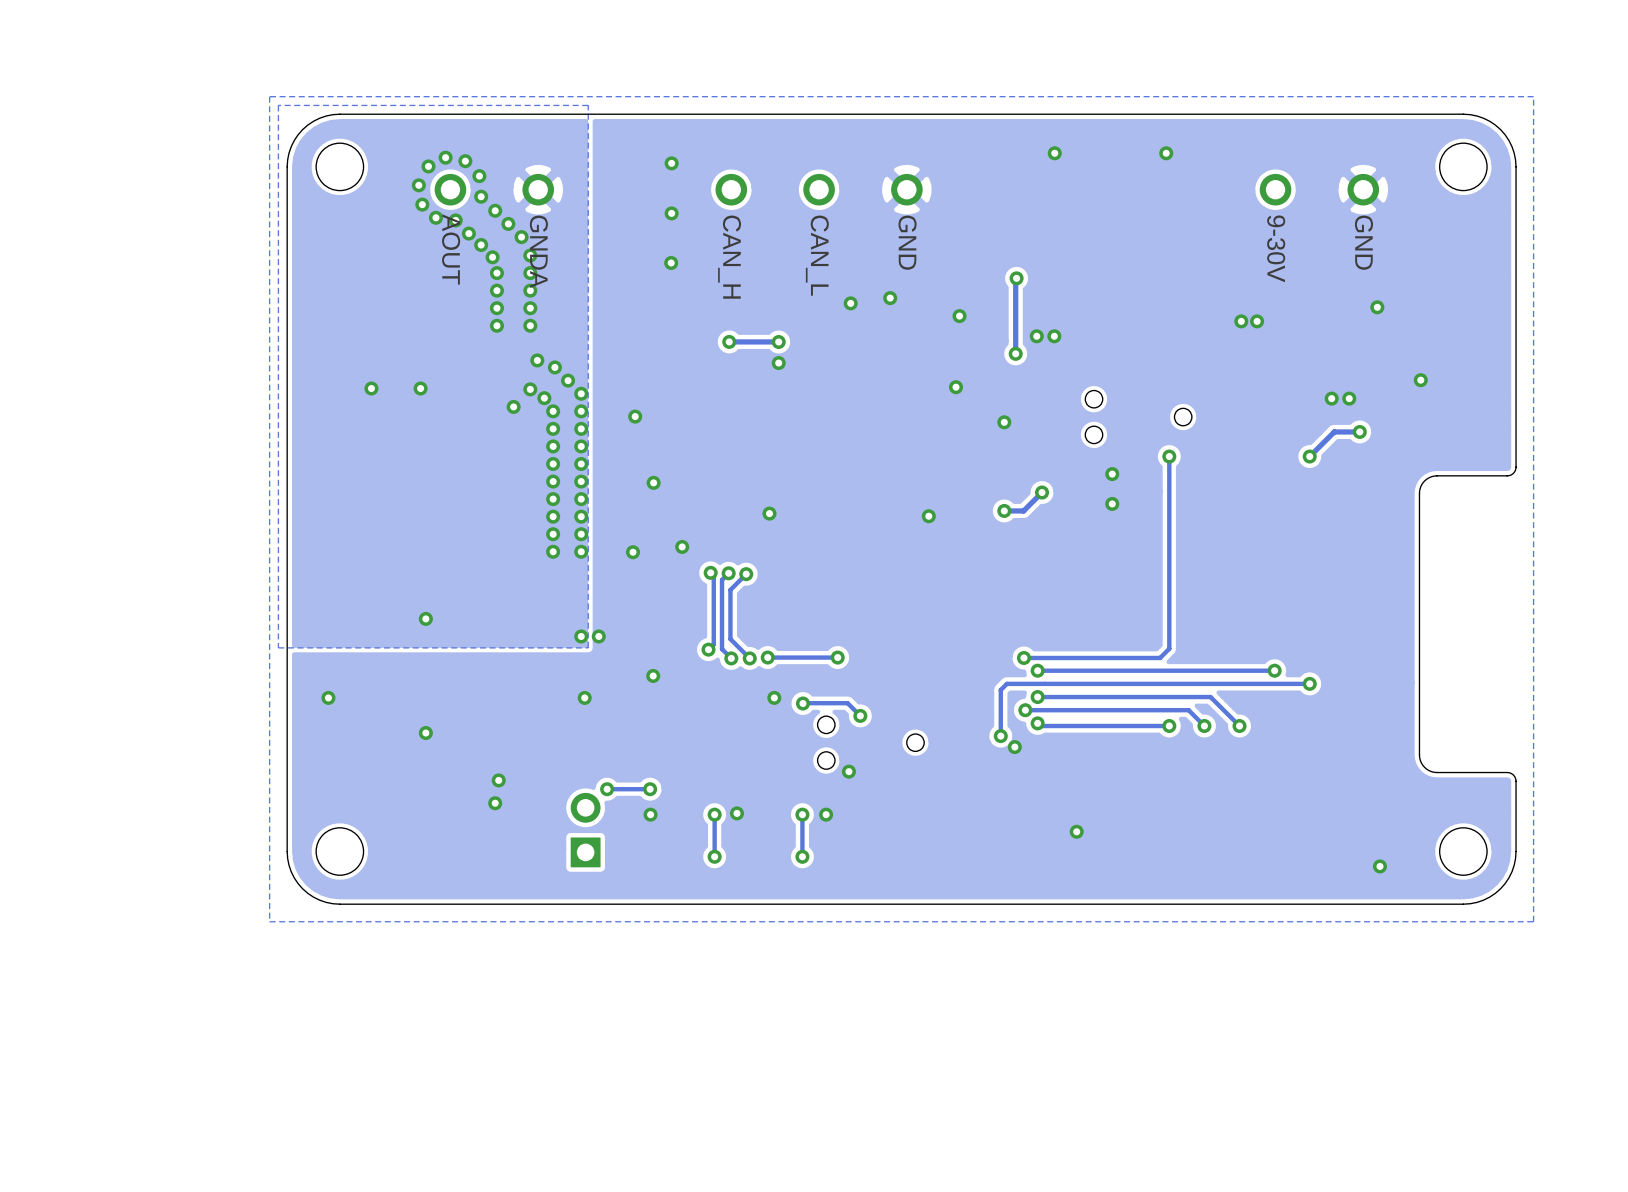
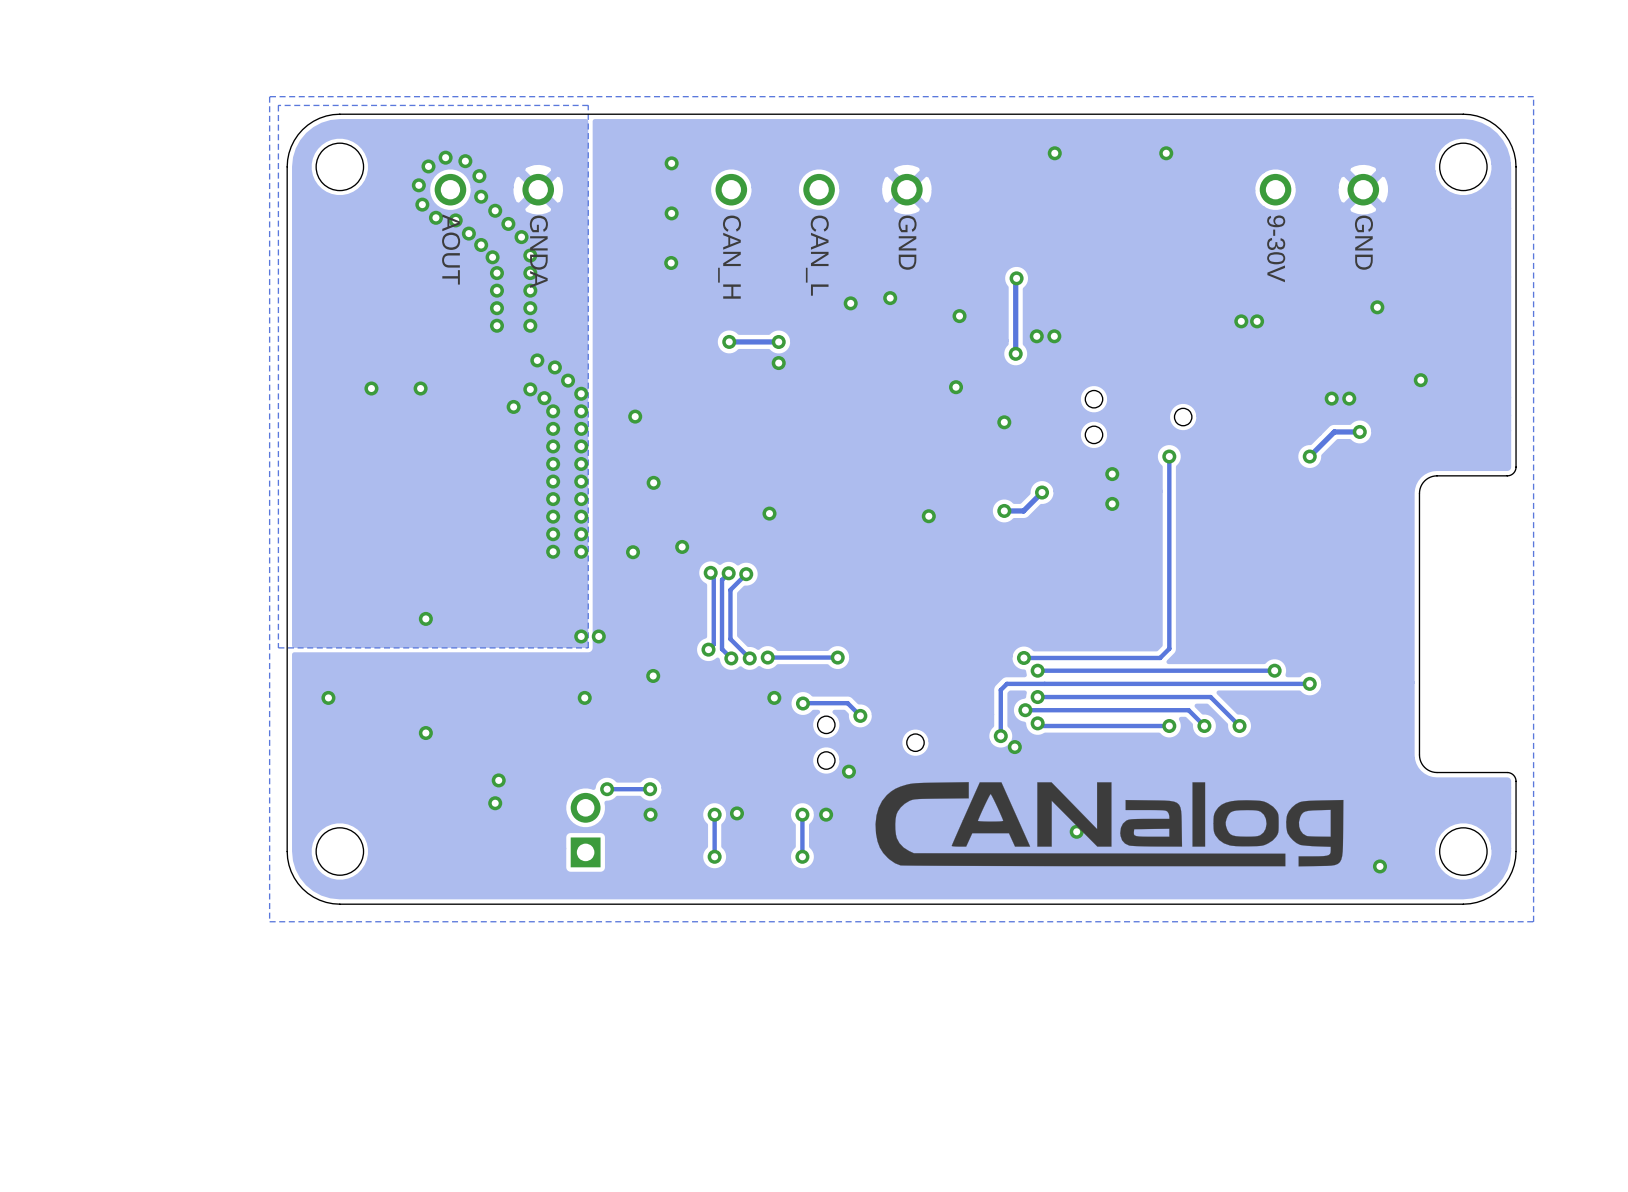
drawing: none -> [875, 782, 1344, 867]

